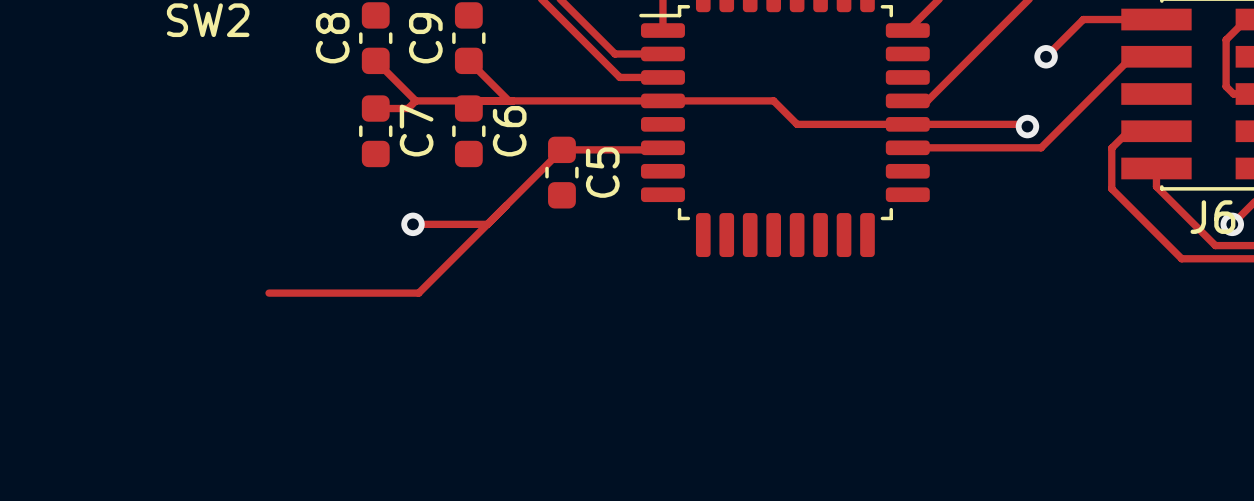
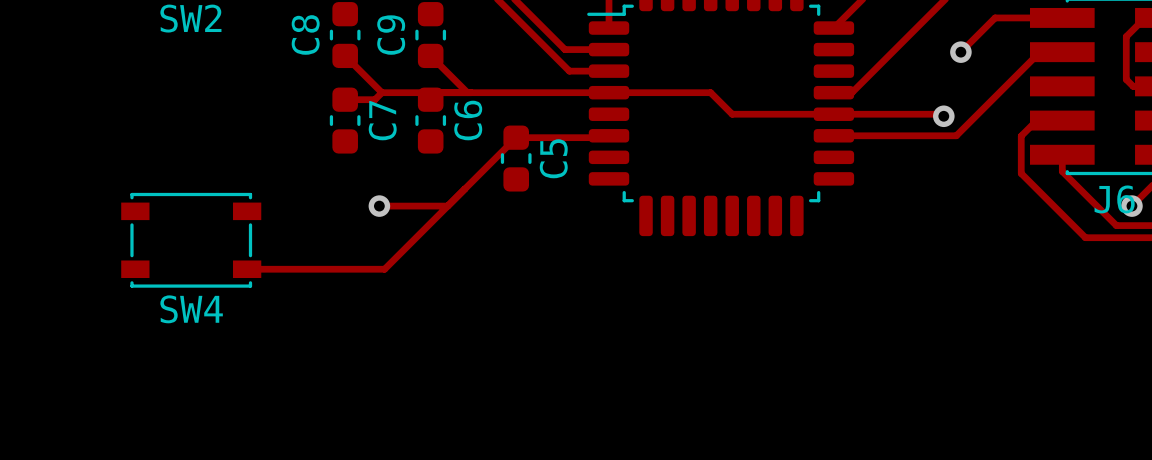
SW4: none -> (191, 240)

